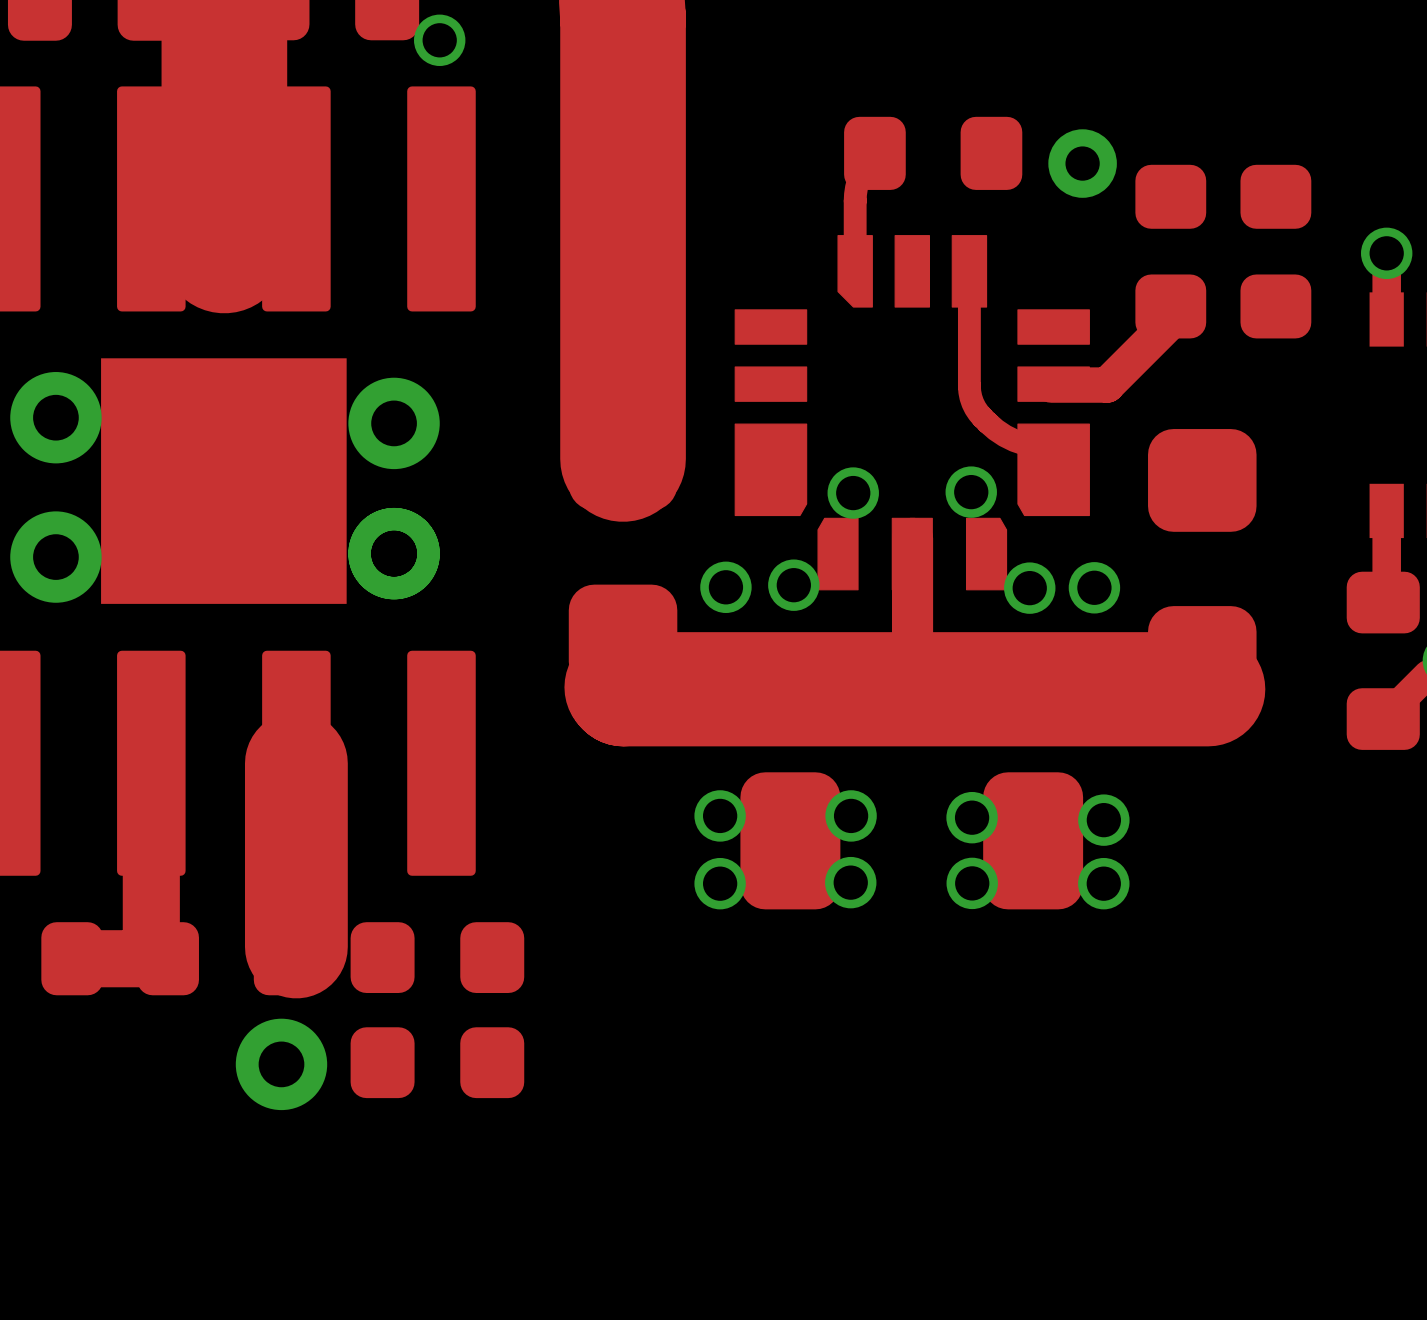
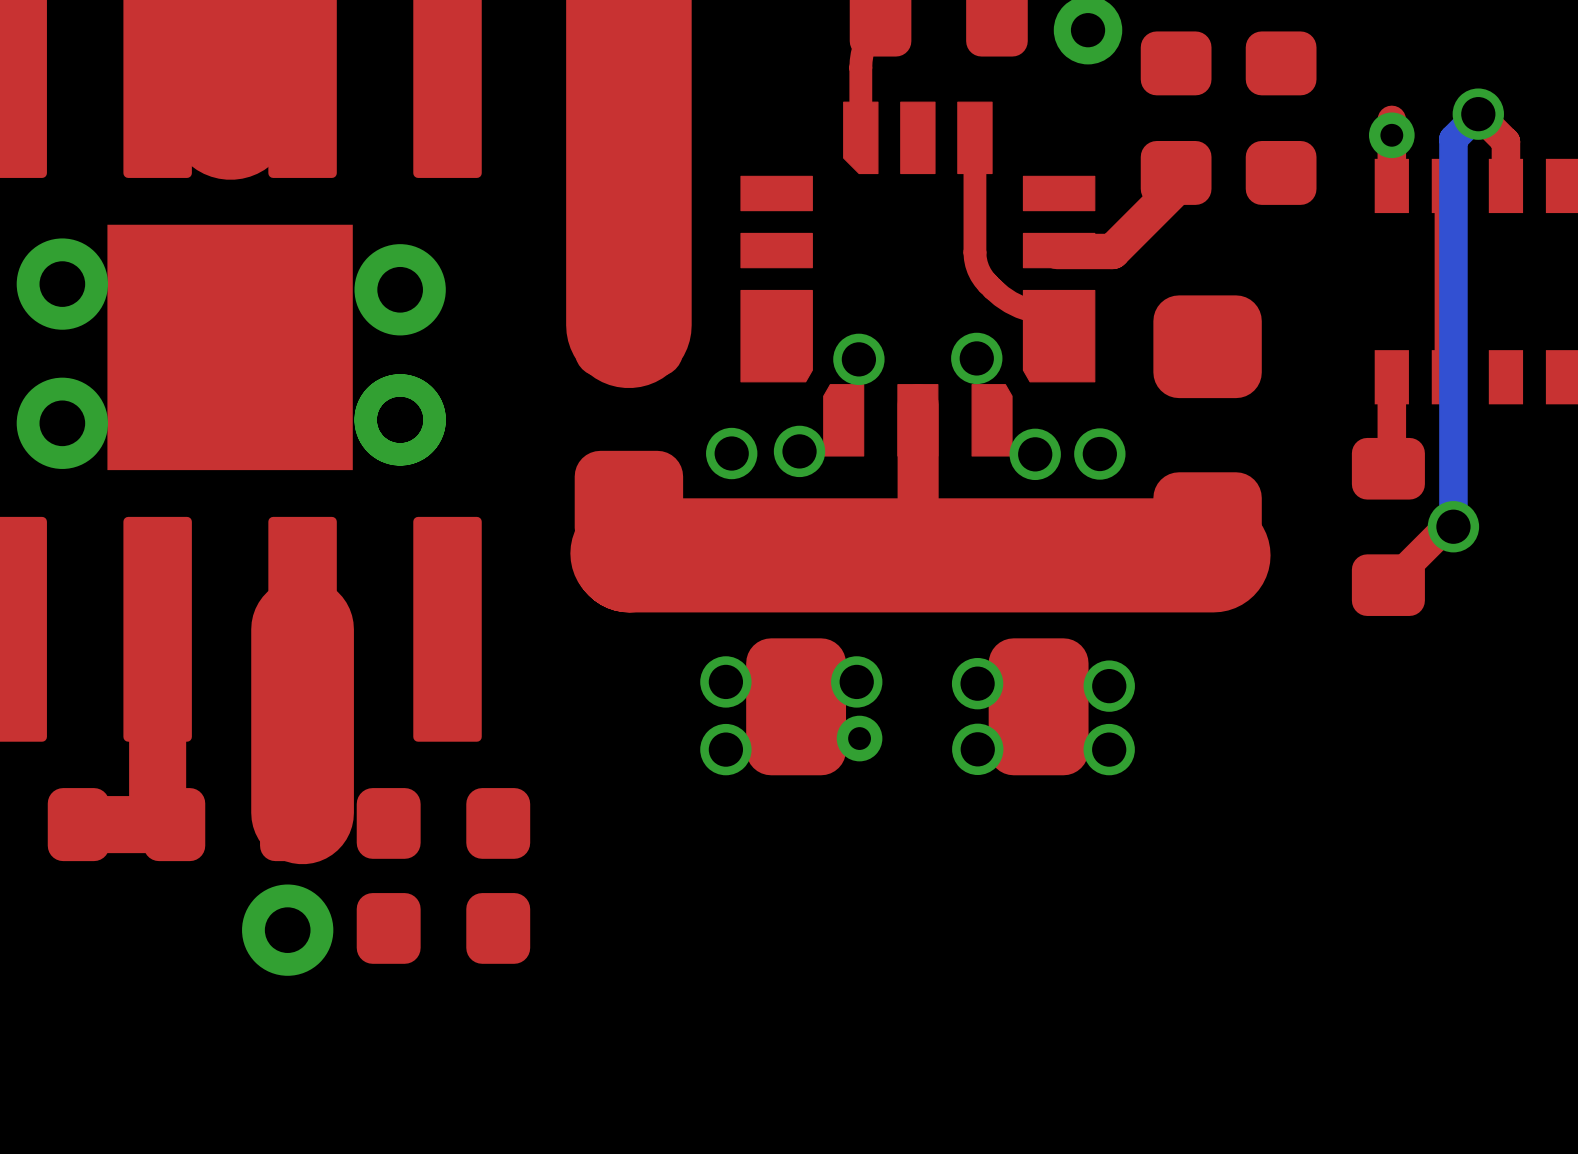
via position: (1386, 253) -> (1391, 135)
via size: [825, 856, 877, 909] -> [836, 715, 883, 762]

